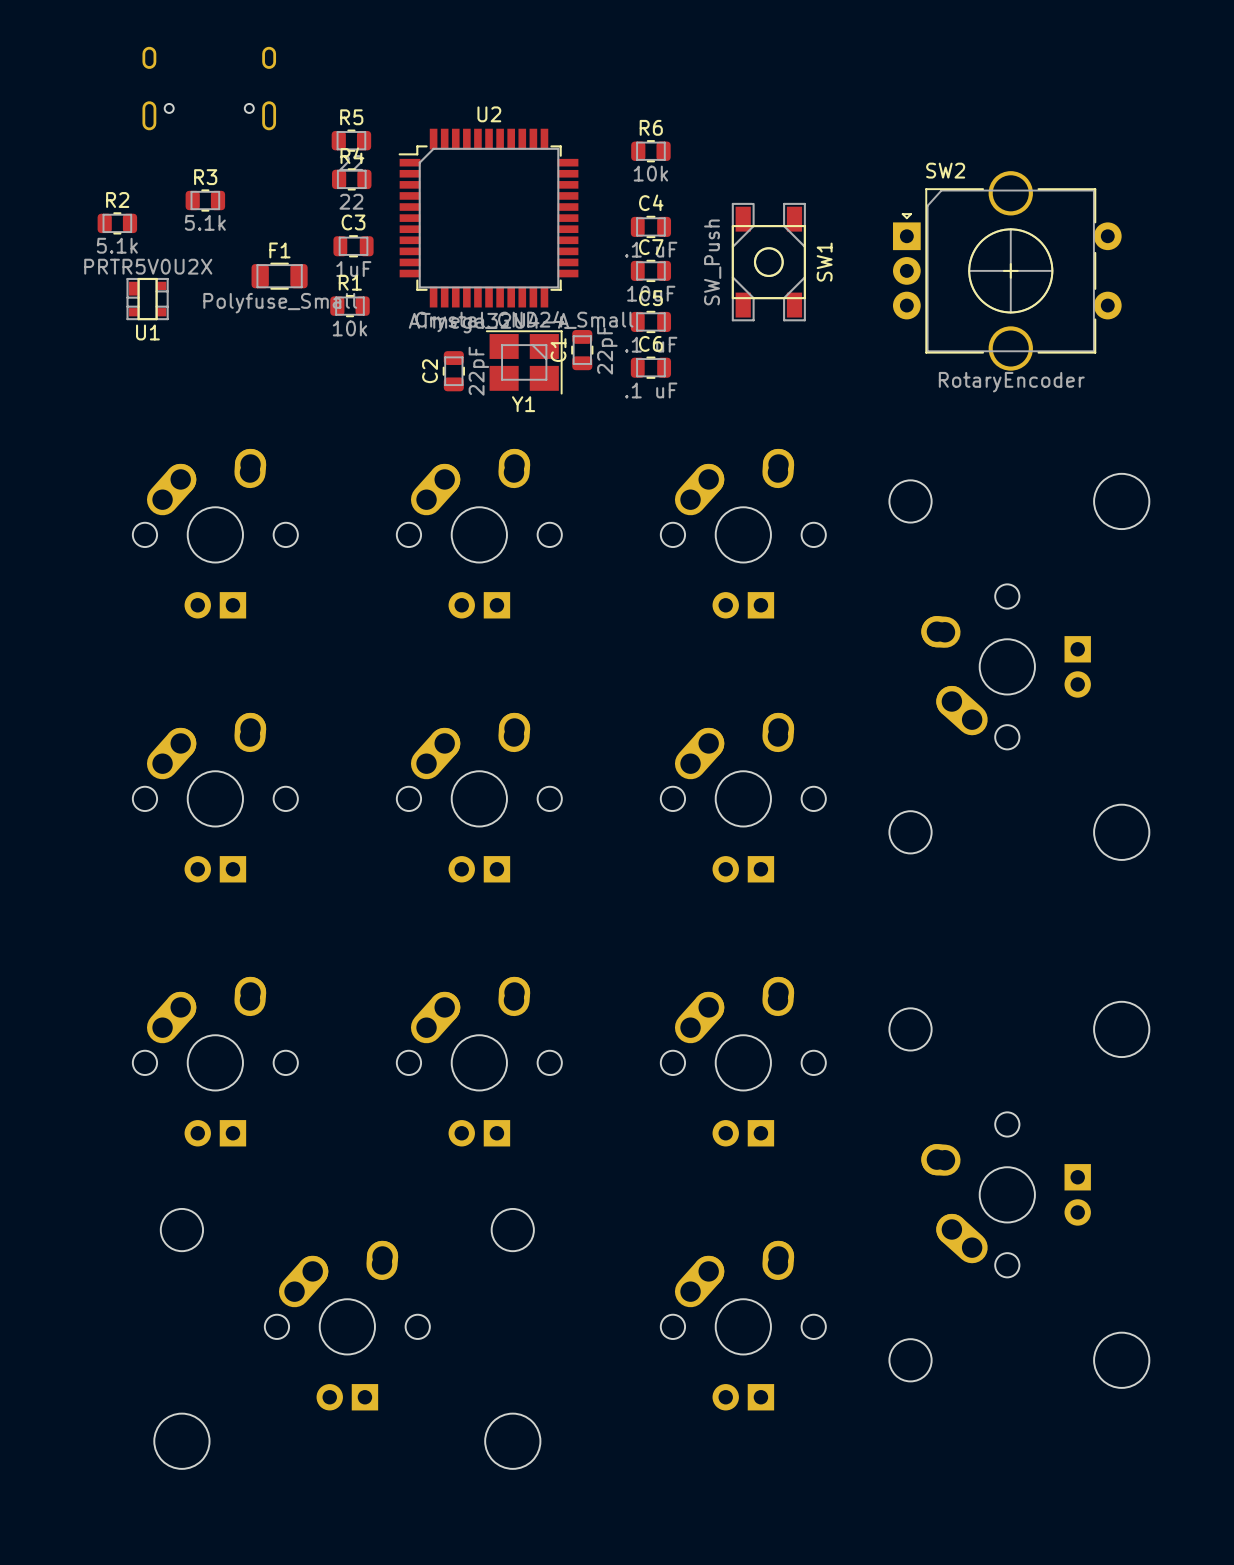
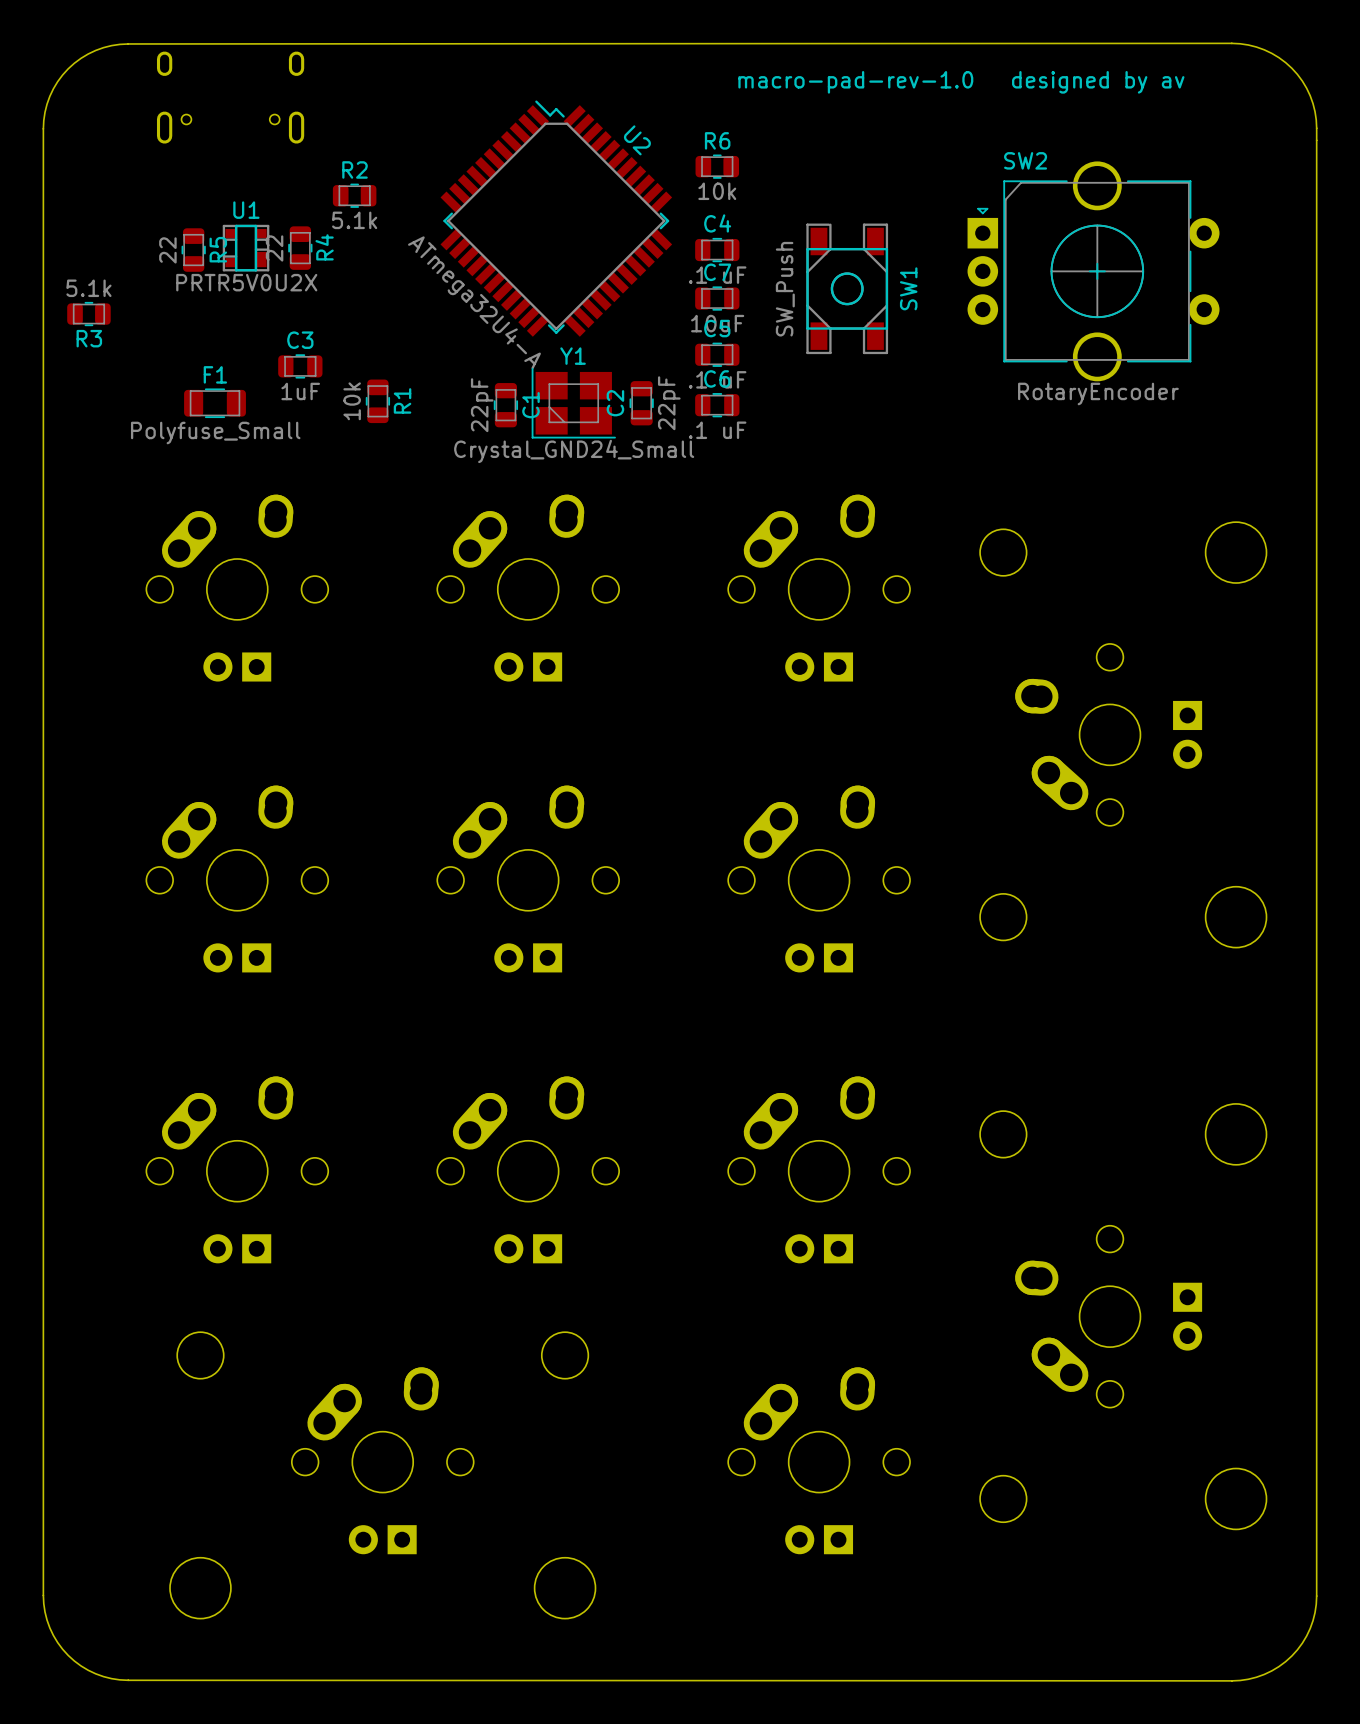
board edge: none -> (1231, 43) (128, 43) (111, 45) (88, 54) (74, 63) (57, 81) (47, 104) (43, 128) (43, 1595) (45, 1612) (53, 1635) (62, 1649) (81, 1665) (103, 1676) (128, 1680) (1231, 1680) (1248, 1679) (1271, 1670) (1291, 1656) (1302, 1643) (1313, 1620) (1316, 1596) (1316, 128) (1315, 111) (1310, 95) (1302, 81) (1291, 68) (1278, 57) (1264, 49) (1248, 45) (1231, 43)
text: none -> macro-pad-rev-1.0 (855, 82)
text: none -> designed by av (1098, 82)
R5 rotation: 0° (351, 140) -> 90° clockwise (193, 250)
R5 position: (351, 140) -> (193, 250)
R3 name position: R3 (205, 177) -> R3 (89, 338)
R4 rotation: 0° (351, 179) -> 90° clockwise (300, 248)
R4 position: (351, 179) -> (300, 248)
R3 position: (205, 200) -> (88, 314)
U2 rotation: 0° (488, 218) -> 45° clockwise (556, 218)
R3 value position: 5.1k (205, 222) -> 5.1k (88, 288)
R2 position: (117, 223) -> (354, 195)
C3 position: (353, 246) -> (300, 366)
SW2 position: (1007, 270) -> (1093, 271)
F1 position: (279, 276) -> (215, 403)
U1 rotation: 0° (147, 299) -> 180° (246, 248)
U1 position: (147, 299) -> (246, 248)
R1 rotation: 0° (349, 306) -> 90° clockwise (377, 401)
R1 position: (349, 306) -> (377, 401)
C1 name position: C1 (558, 350) -> C1 (530, 405)
C1 position: (582, 350) -> (505, 405)
C1 value position: 22pF (607, 350) -> 22pF (482, 405)
Y1 rotation: 0° (524, 362) -> 180° (573, 403)
C2 position: (453, 371) -> (641, 403)

